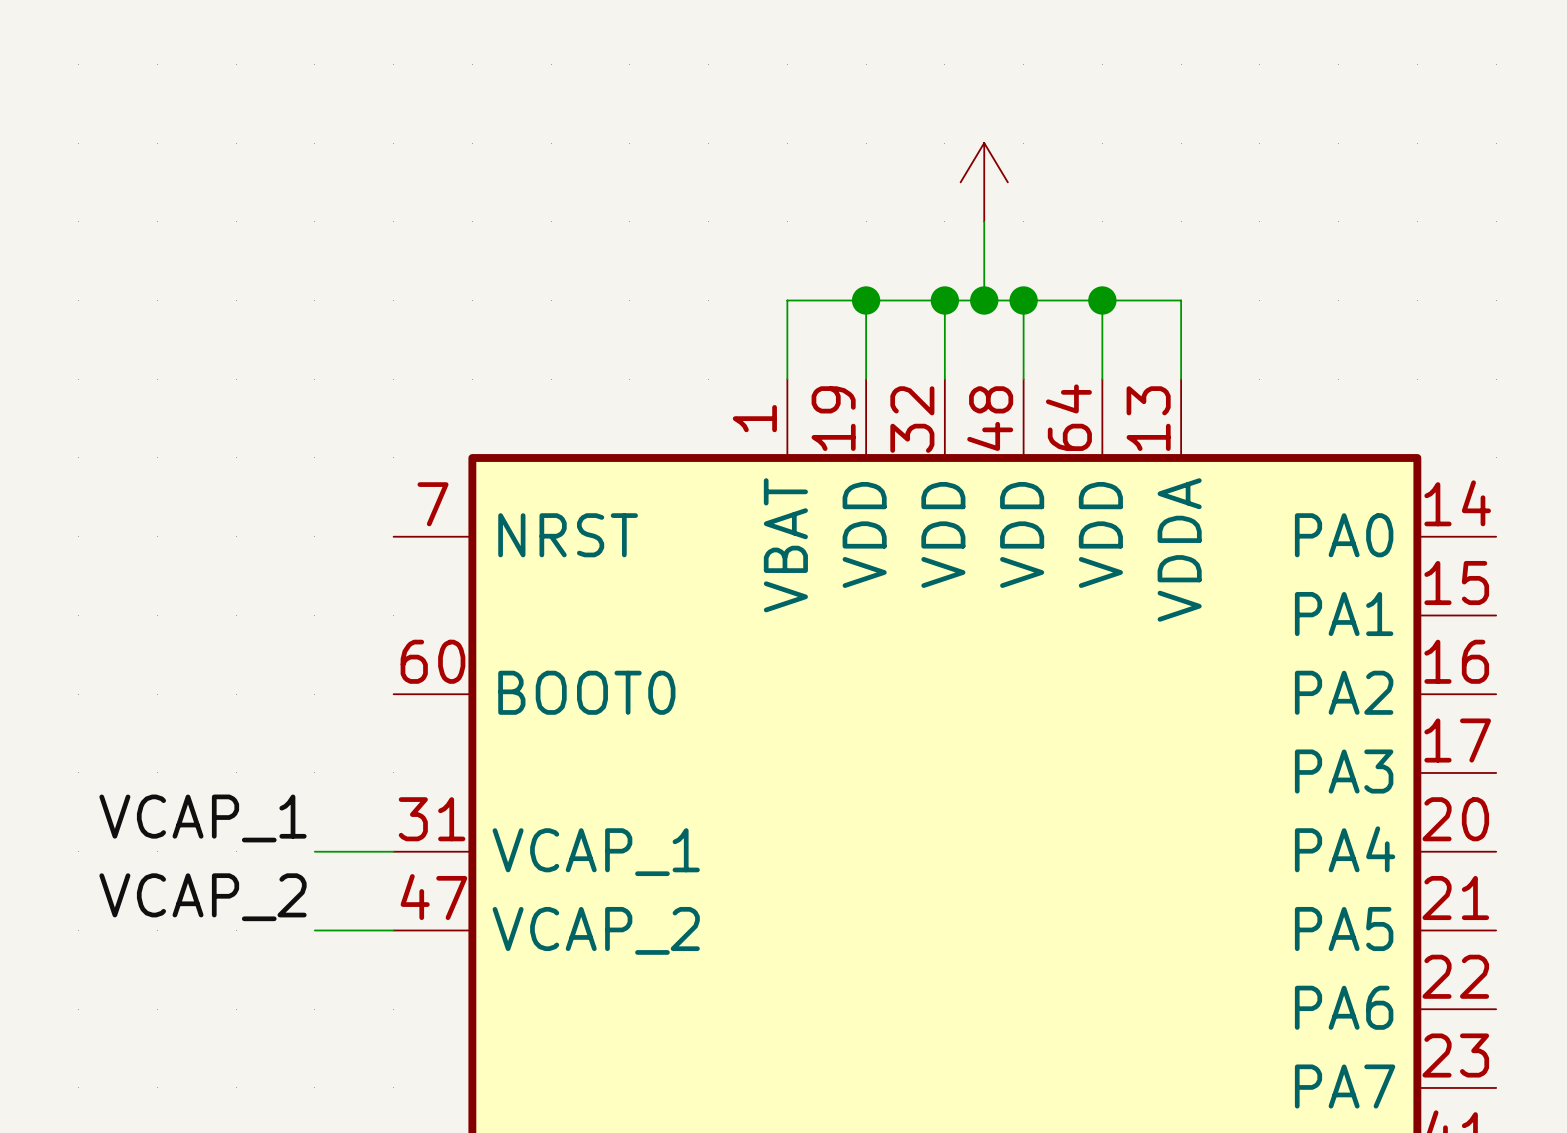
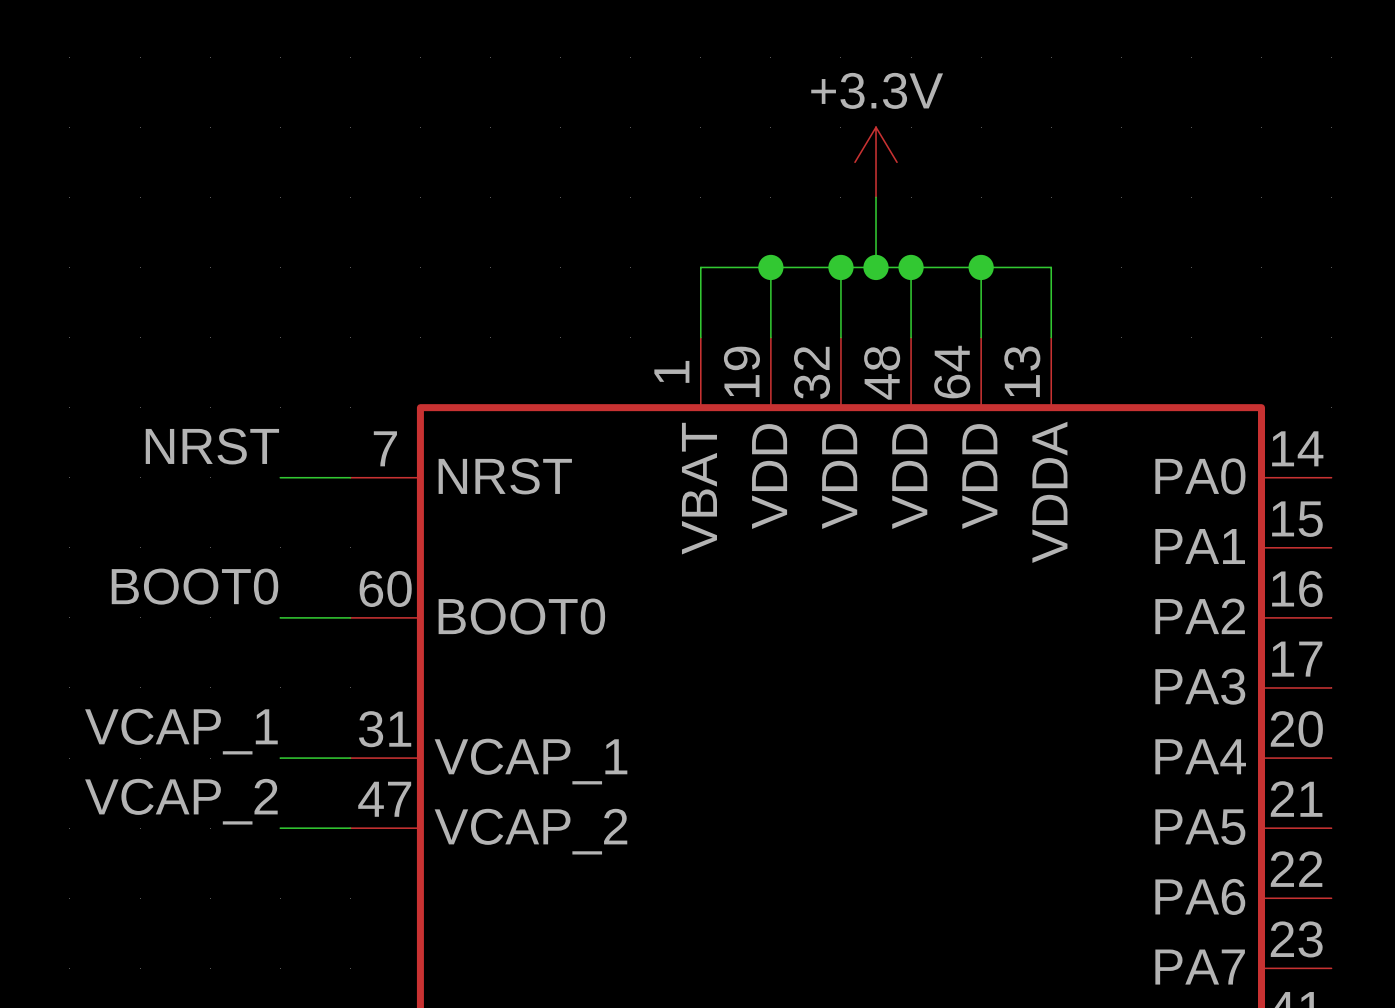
power symbol text: none -> +3.3V (877, 90)
label: none -> NRST (212, 446)
wire: none -> (280, 477) (350, 477)
label: none -> BOOT0 (195, 586)
wire: none -> (280, 617) (350, 617)

